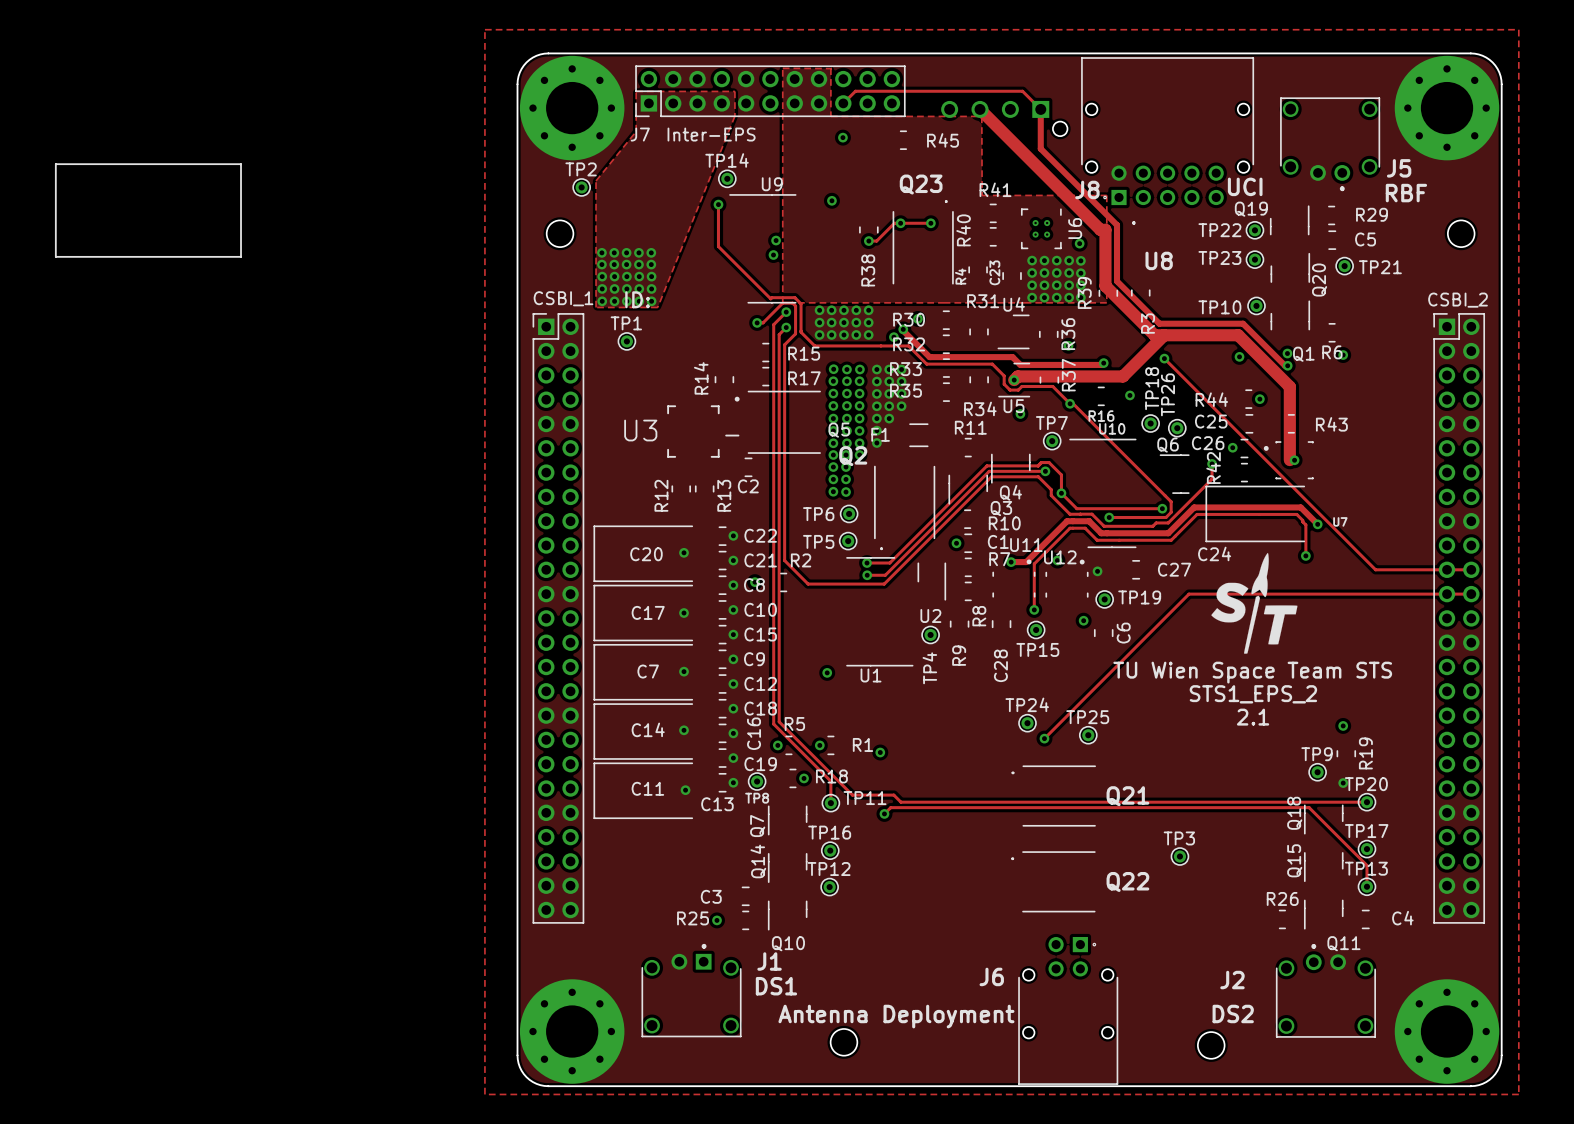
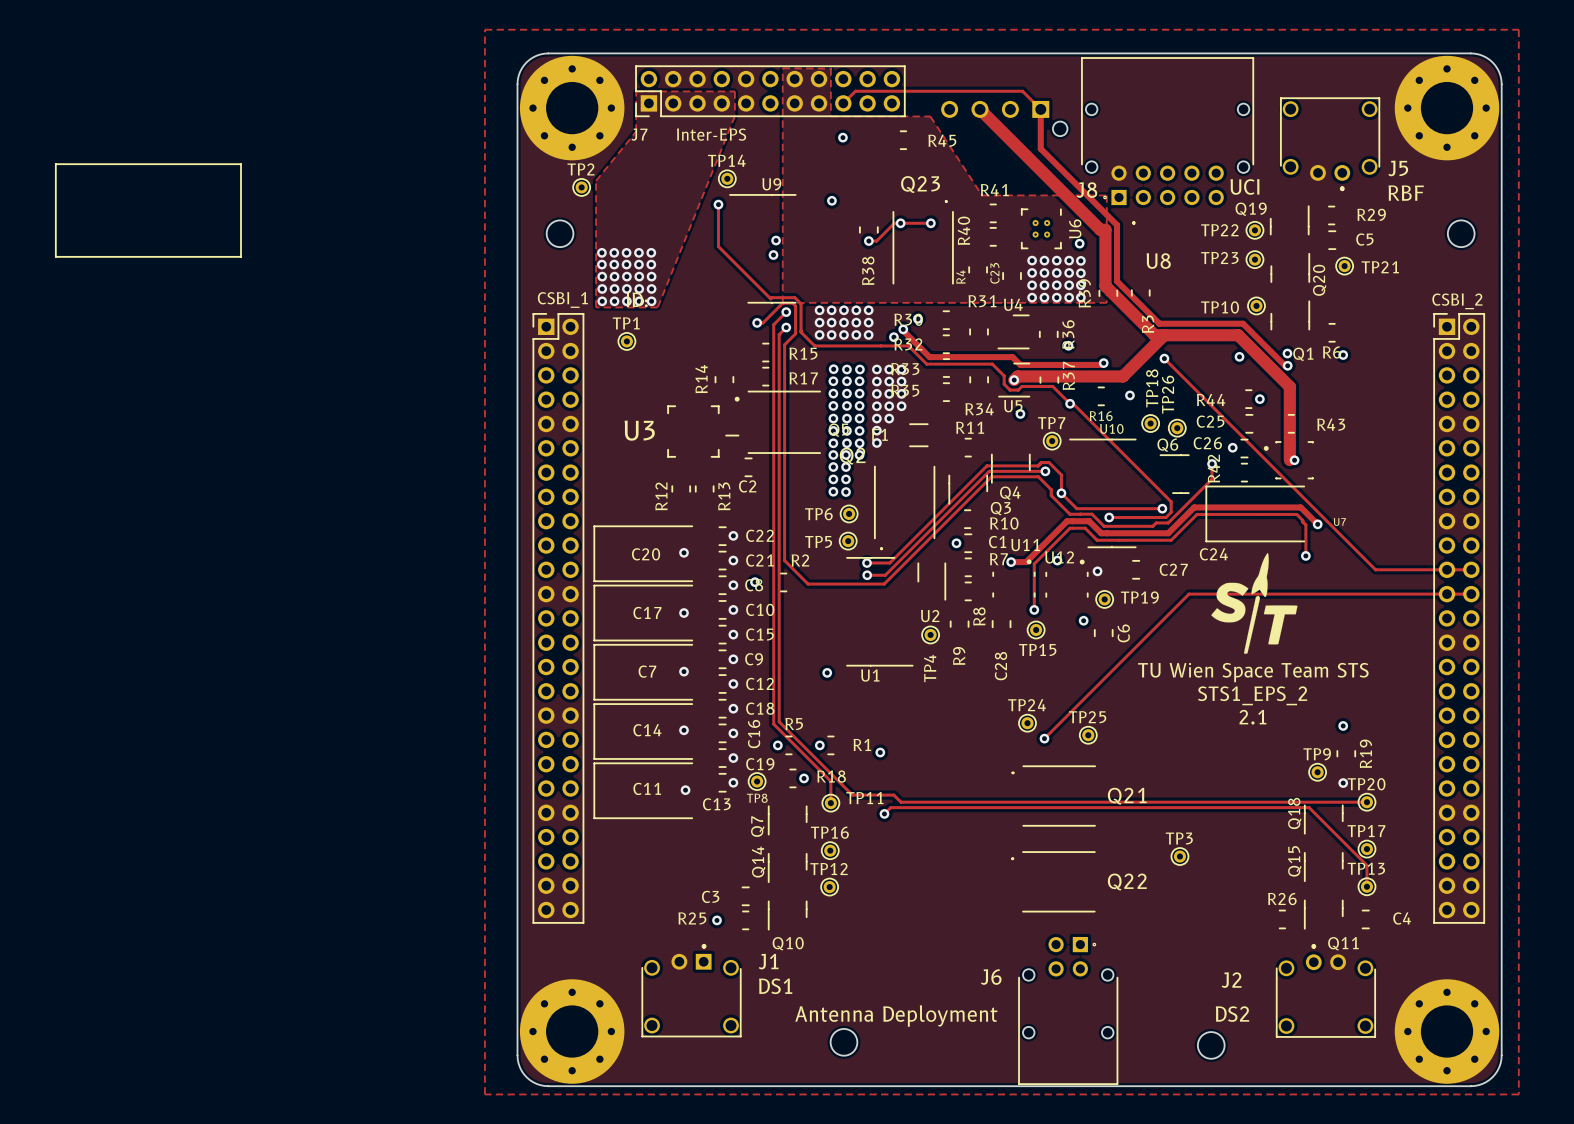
zone outline: (830, 116) (981, 116) (982, 195) -> (830, 116) (930, 116) (982, 195)

